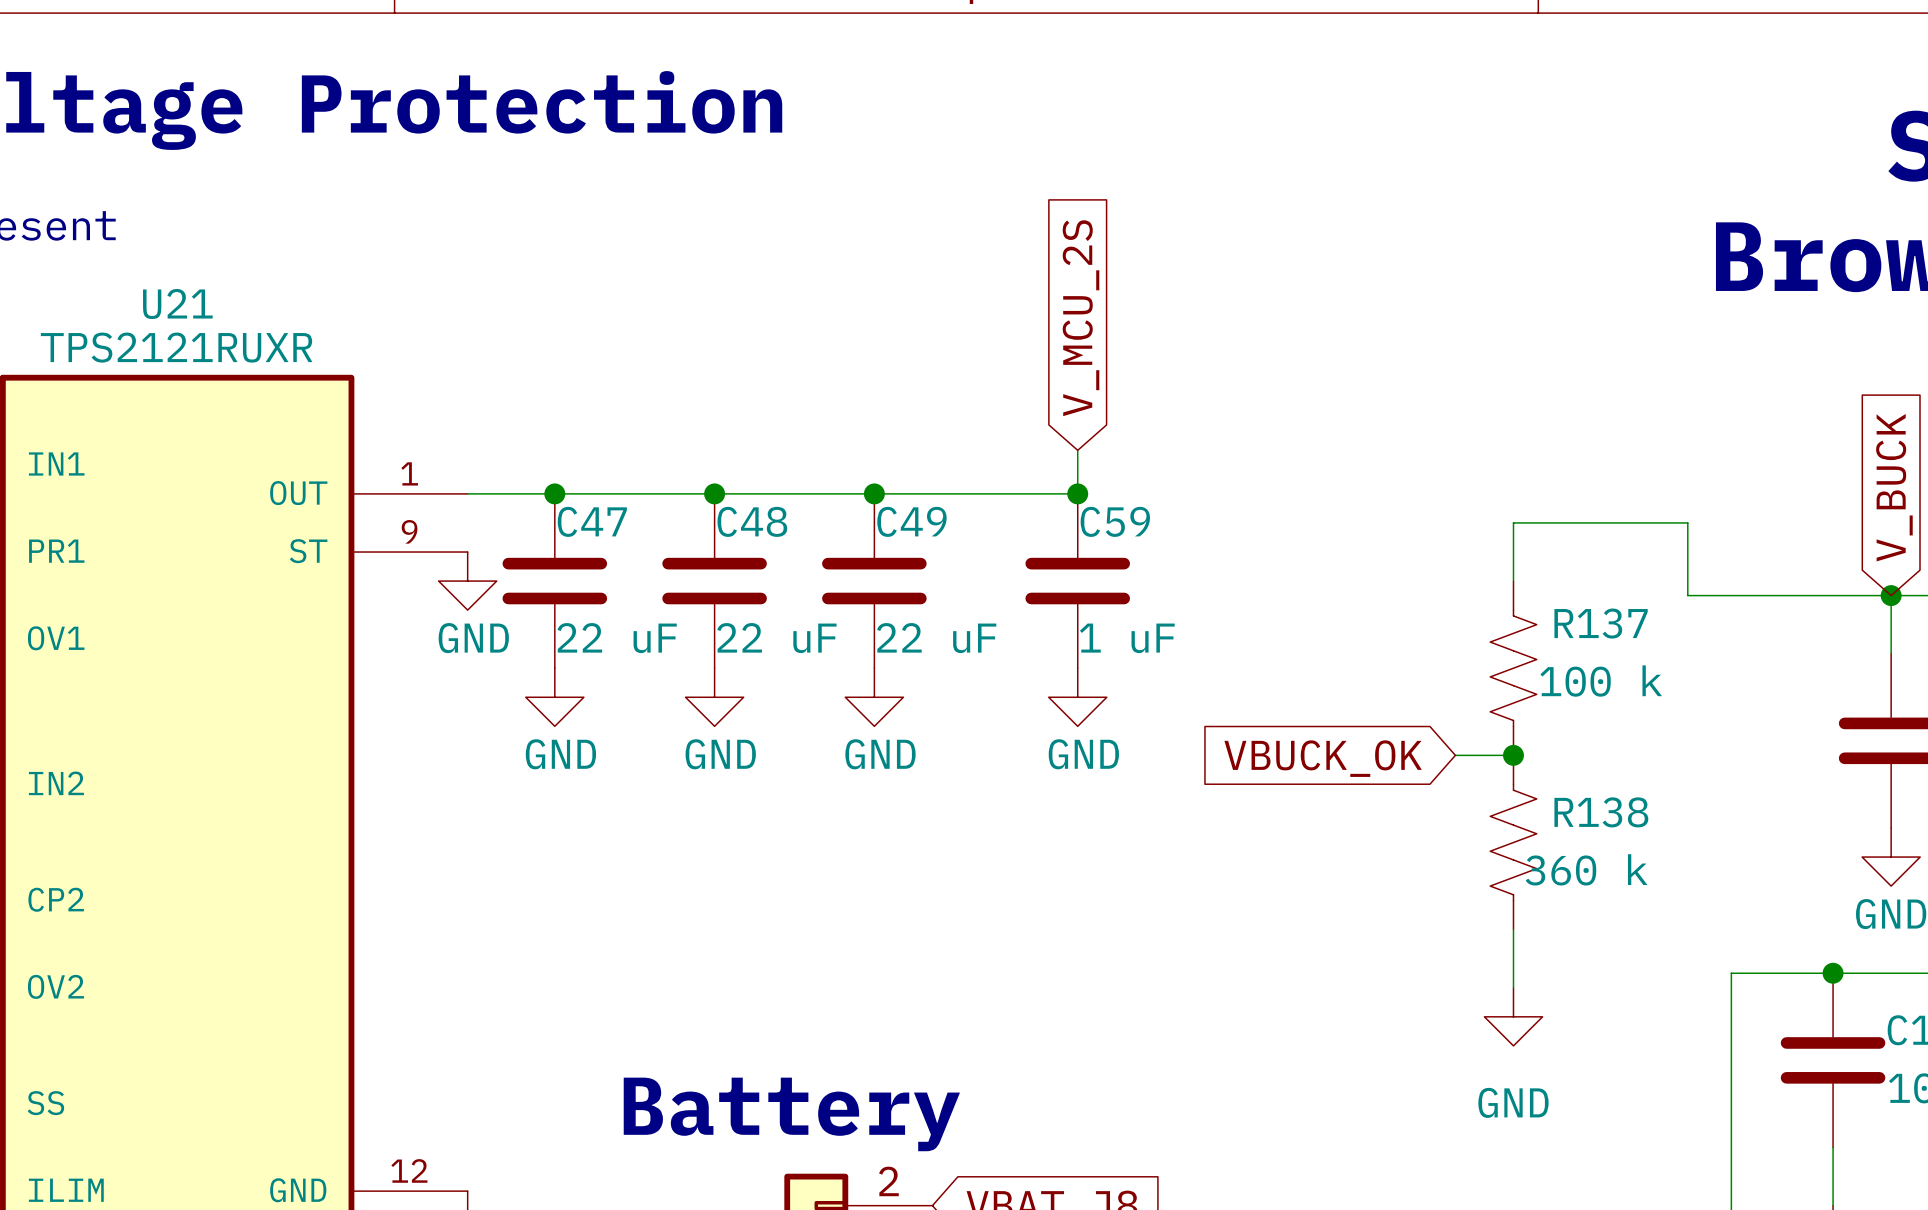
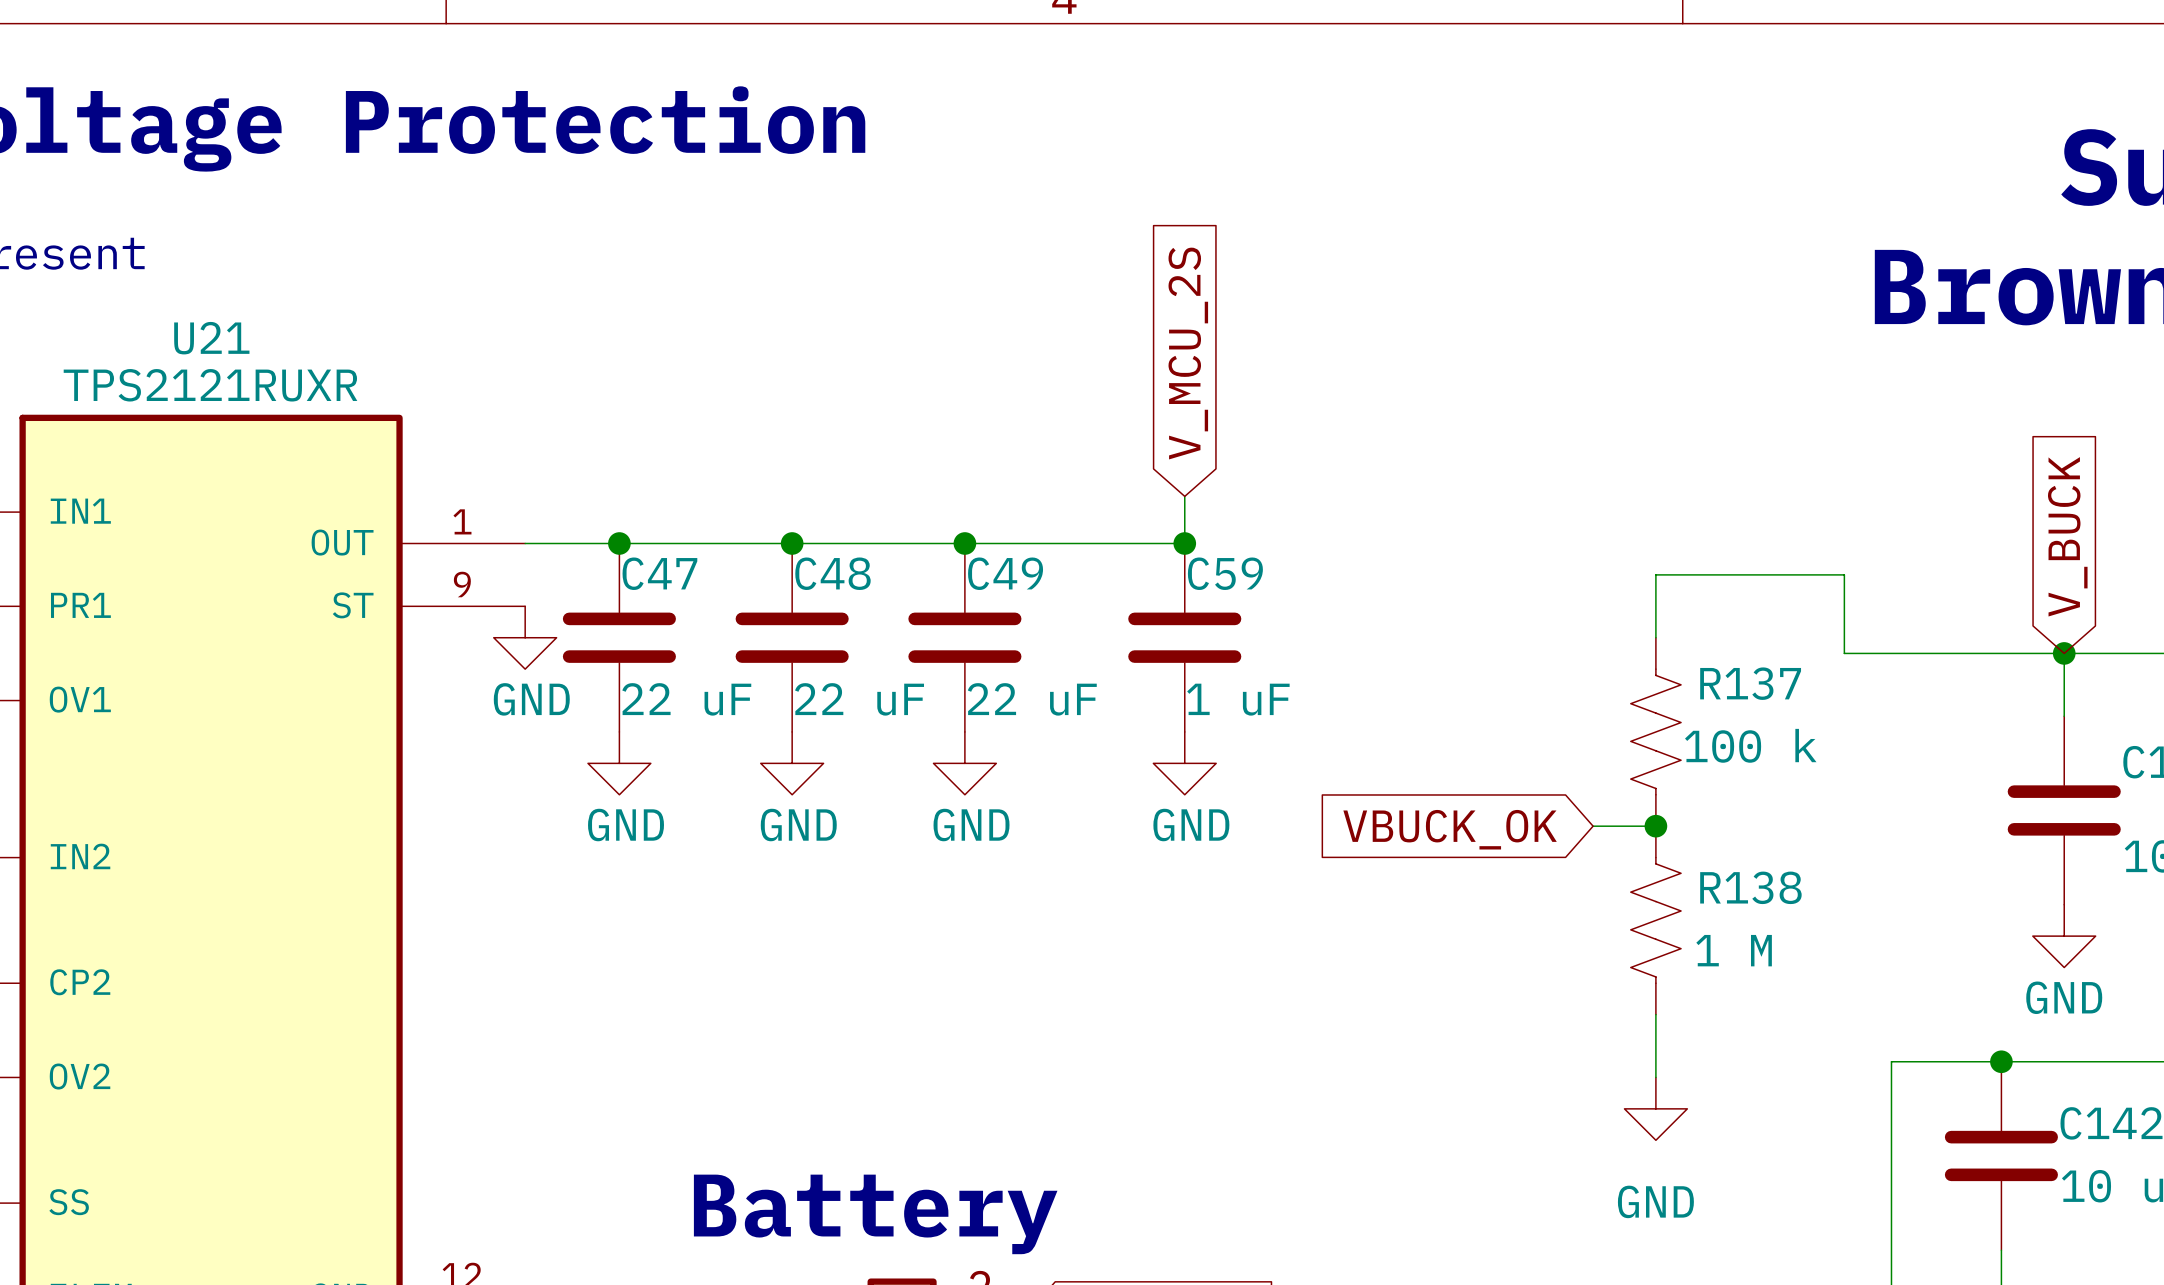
R138 value: 360 k (1586, 869) -> 1 M (1734, 950)

